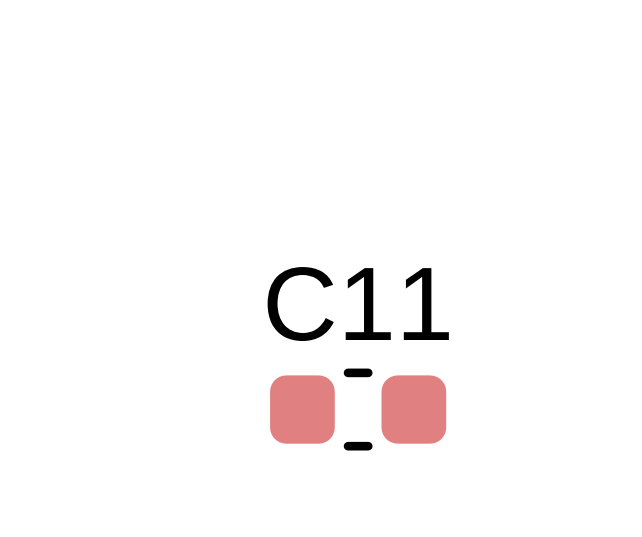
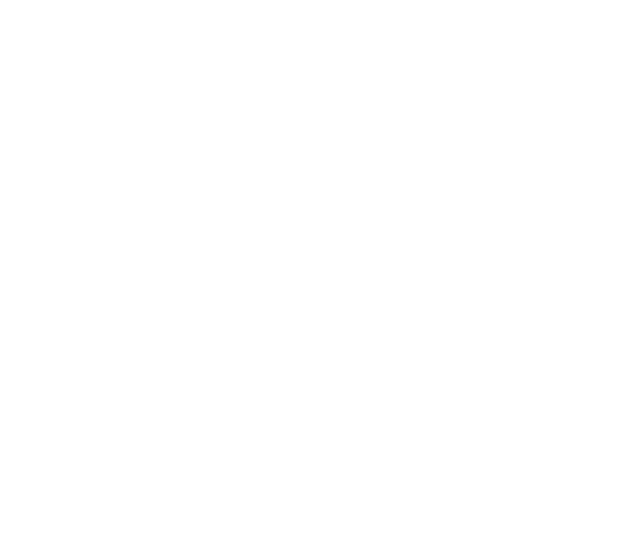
C11: (358, 409) -> none

